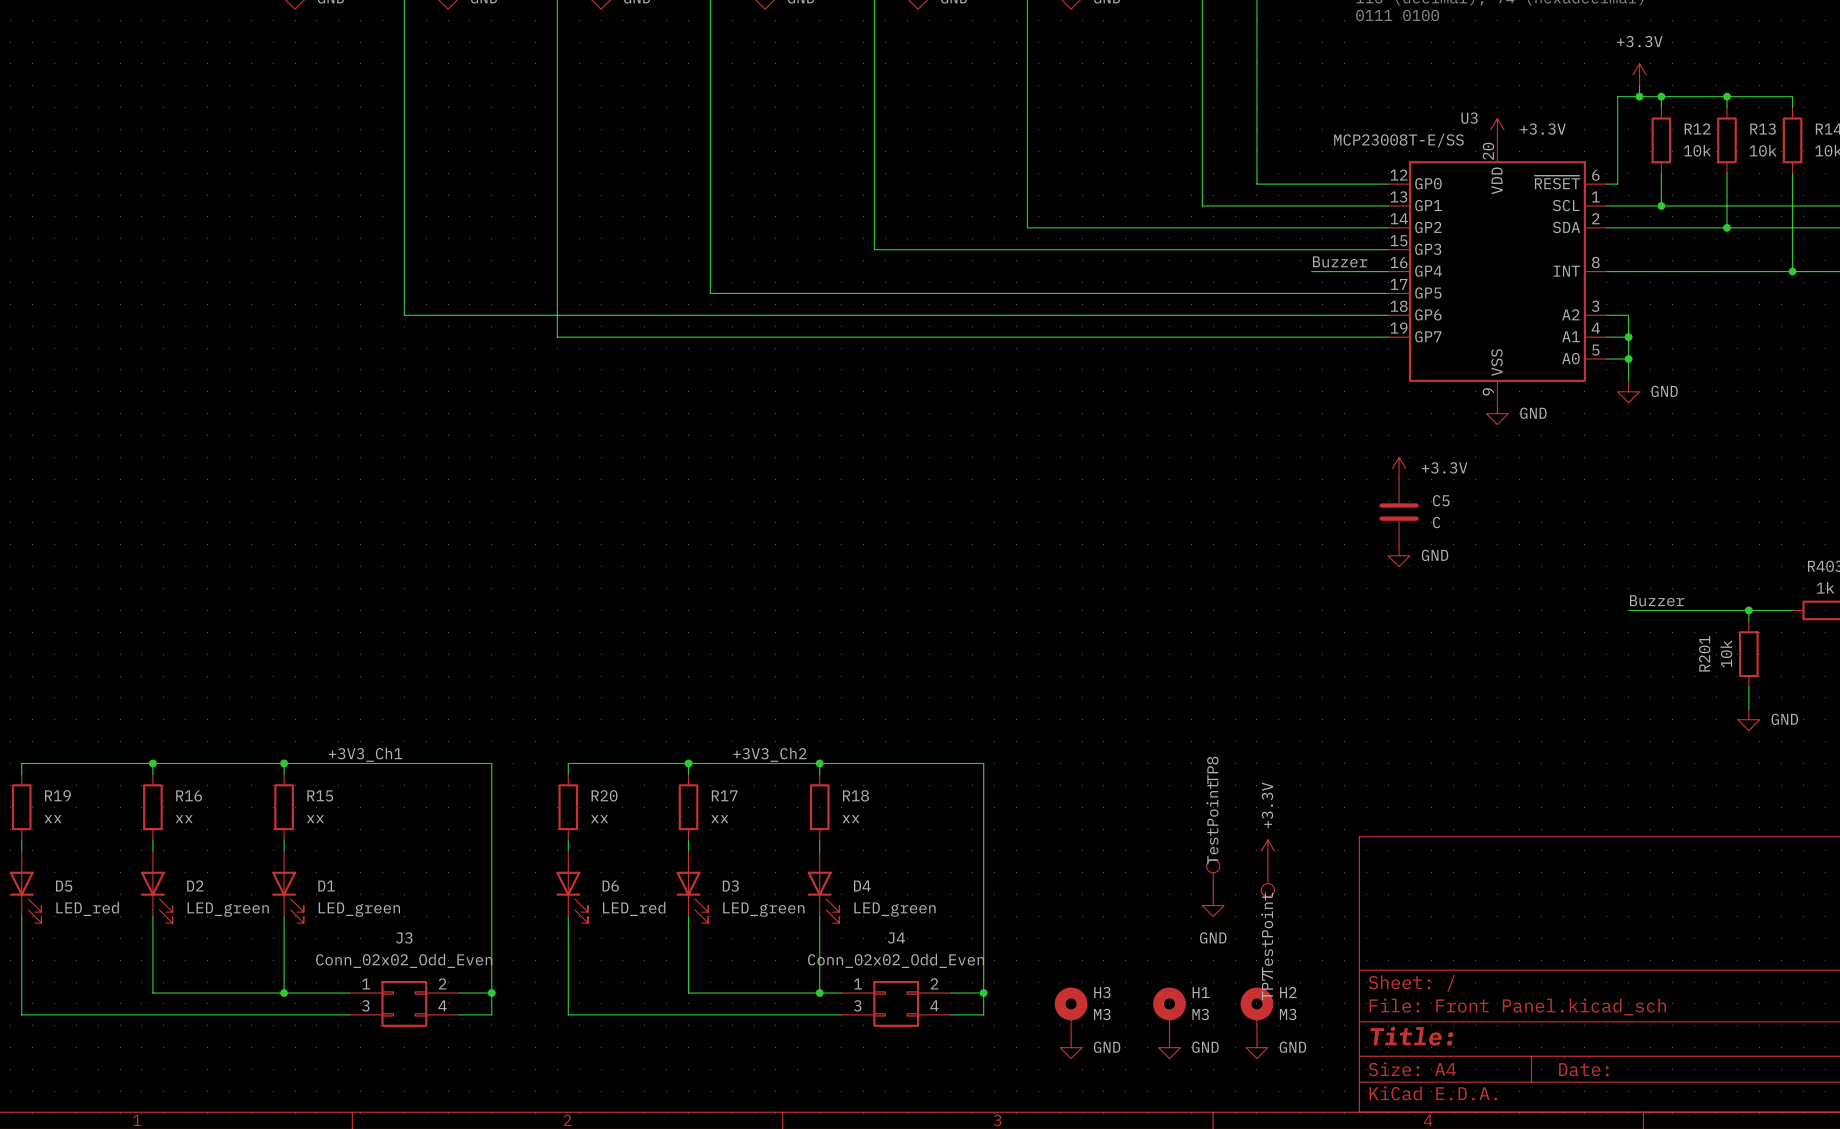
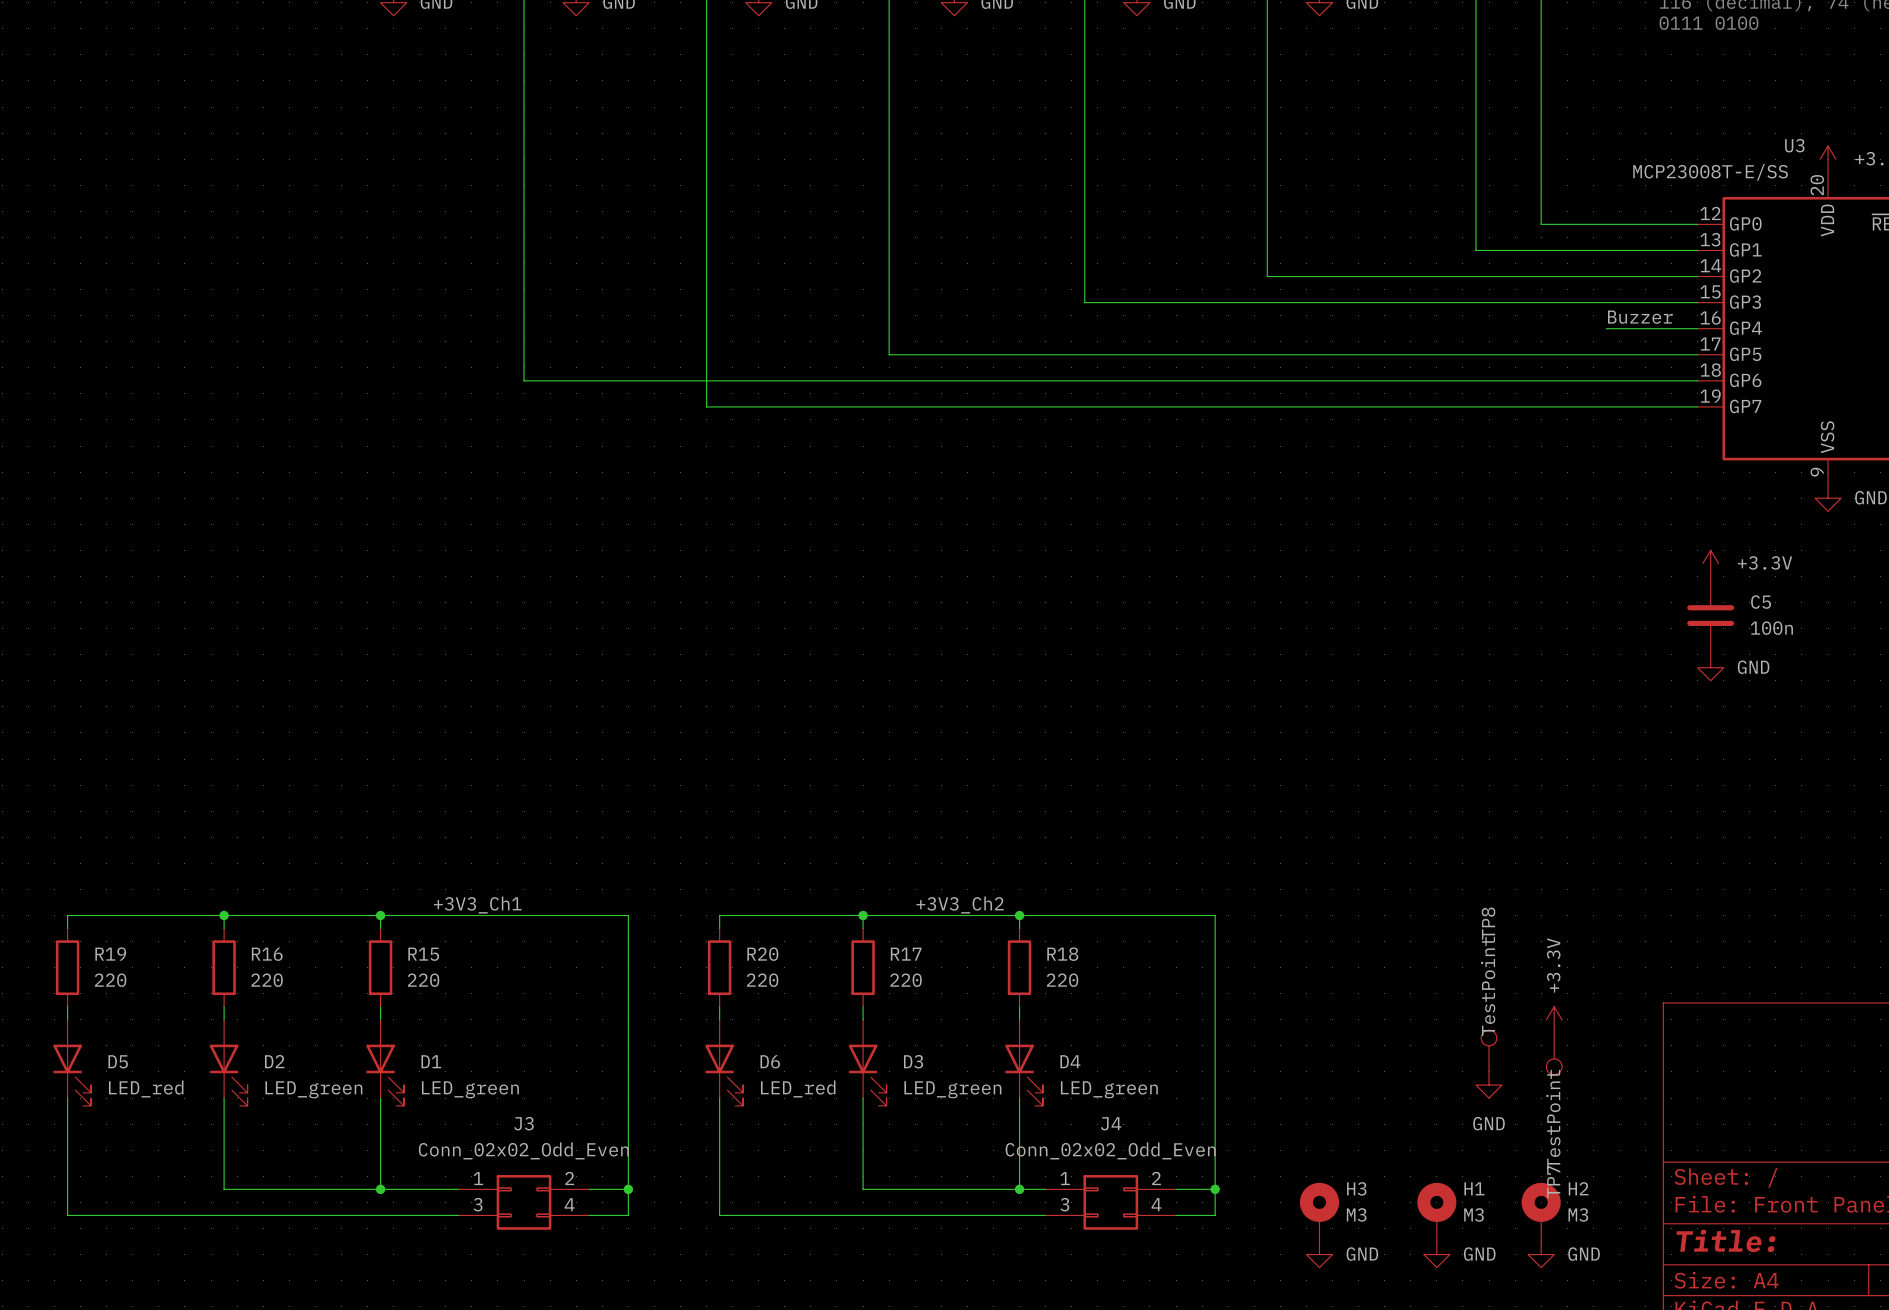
C5 value: C (1436, 522) -> 100n (1771, 628)
R19 value: xx (53, 819) -> 220 (110, 980)
R16 value: xx (184, 819) -> 220 (267, 980)
R15 value: xx (315, 819) -> 220 (423, 980)
R20 value: xx (599, 819) -> 220 (762, 980)
R17 value: xx (719, 819) -> 220 (906, 980)
R18 value: xx (850, 819) -> 220 (1062, 980)

